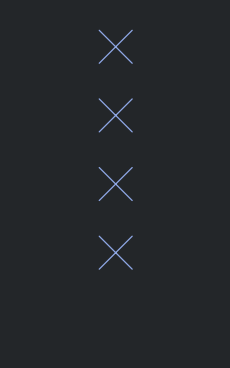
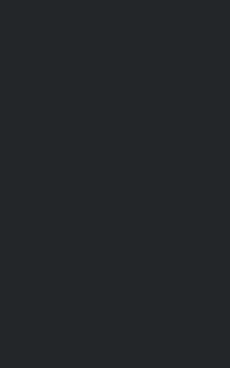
no-connect mark: (115, 46) -> none
no-connect mark: (115, 115) -> none
no-connect mark: (115, 184) -> none
no-connect mark: (115, 252) -> none

